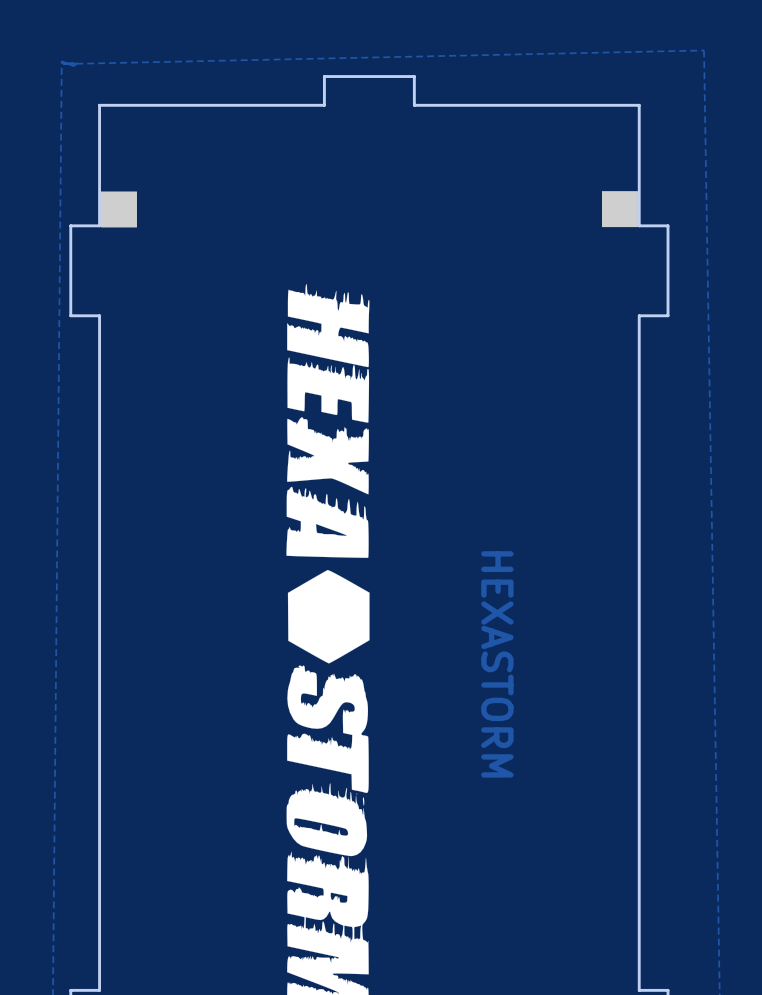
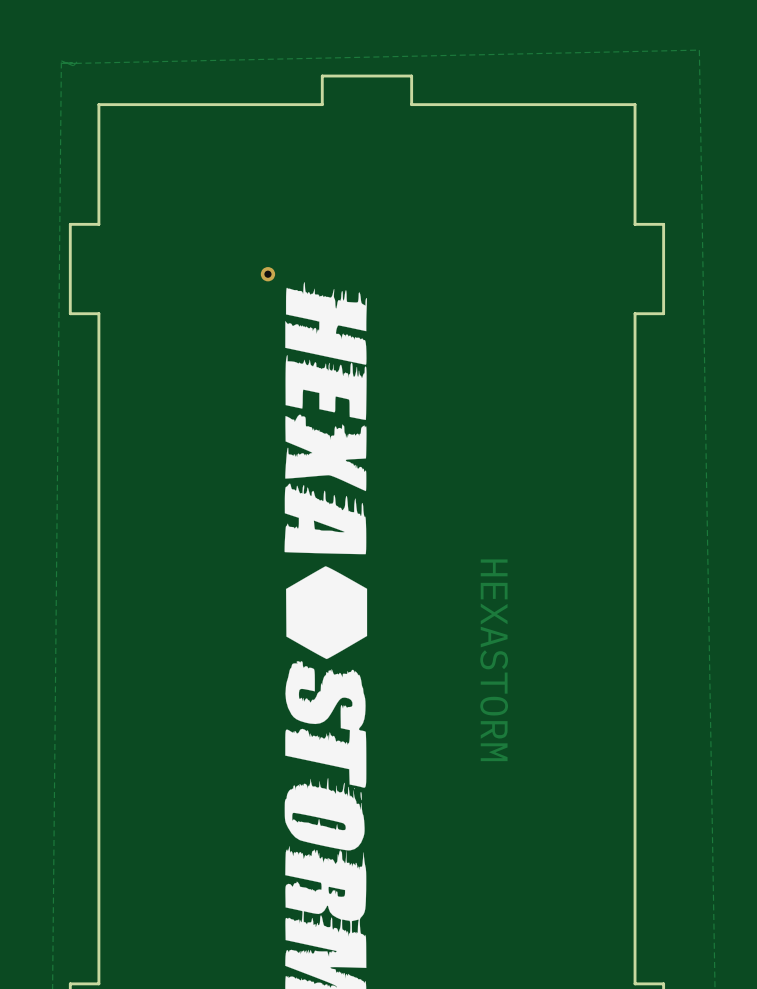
part: (118, 209) -> none
part: (619, 209) -> none
via: none -> (267, 274)

